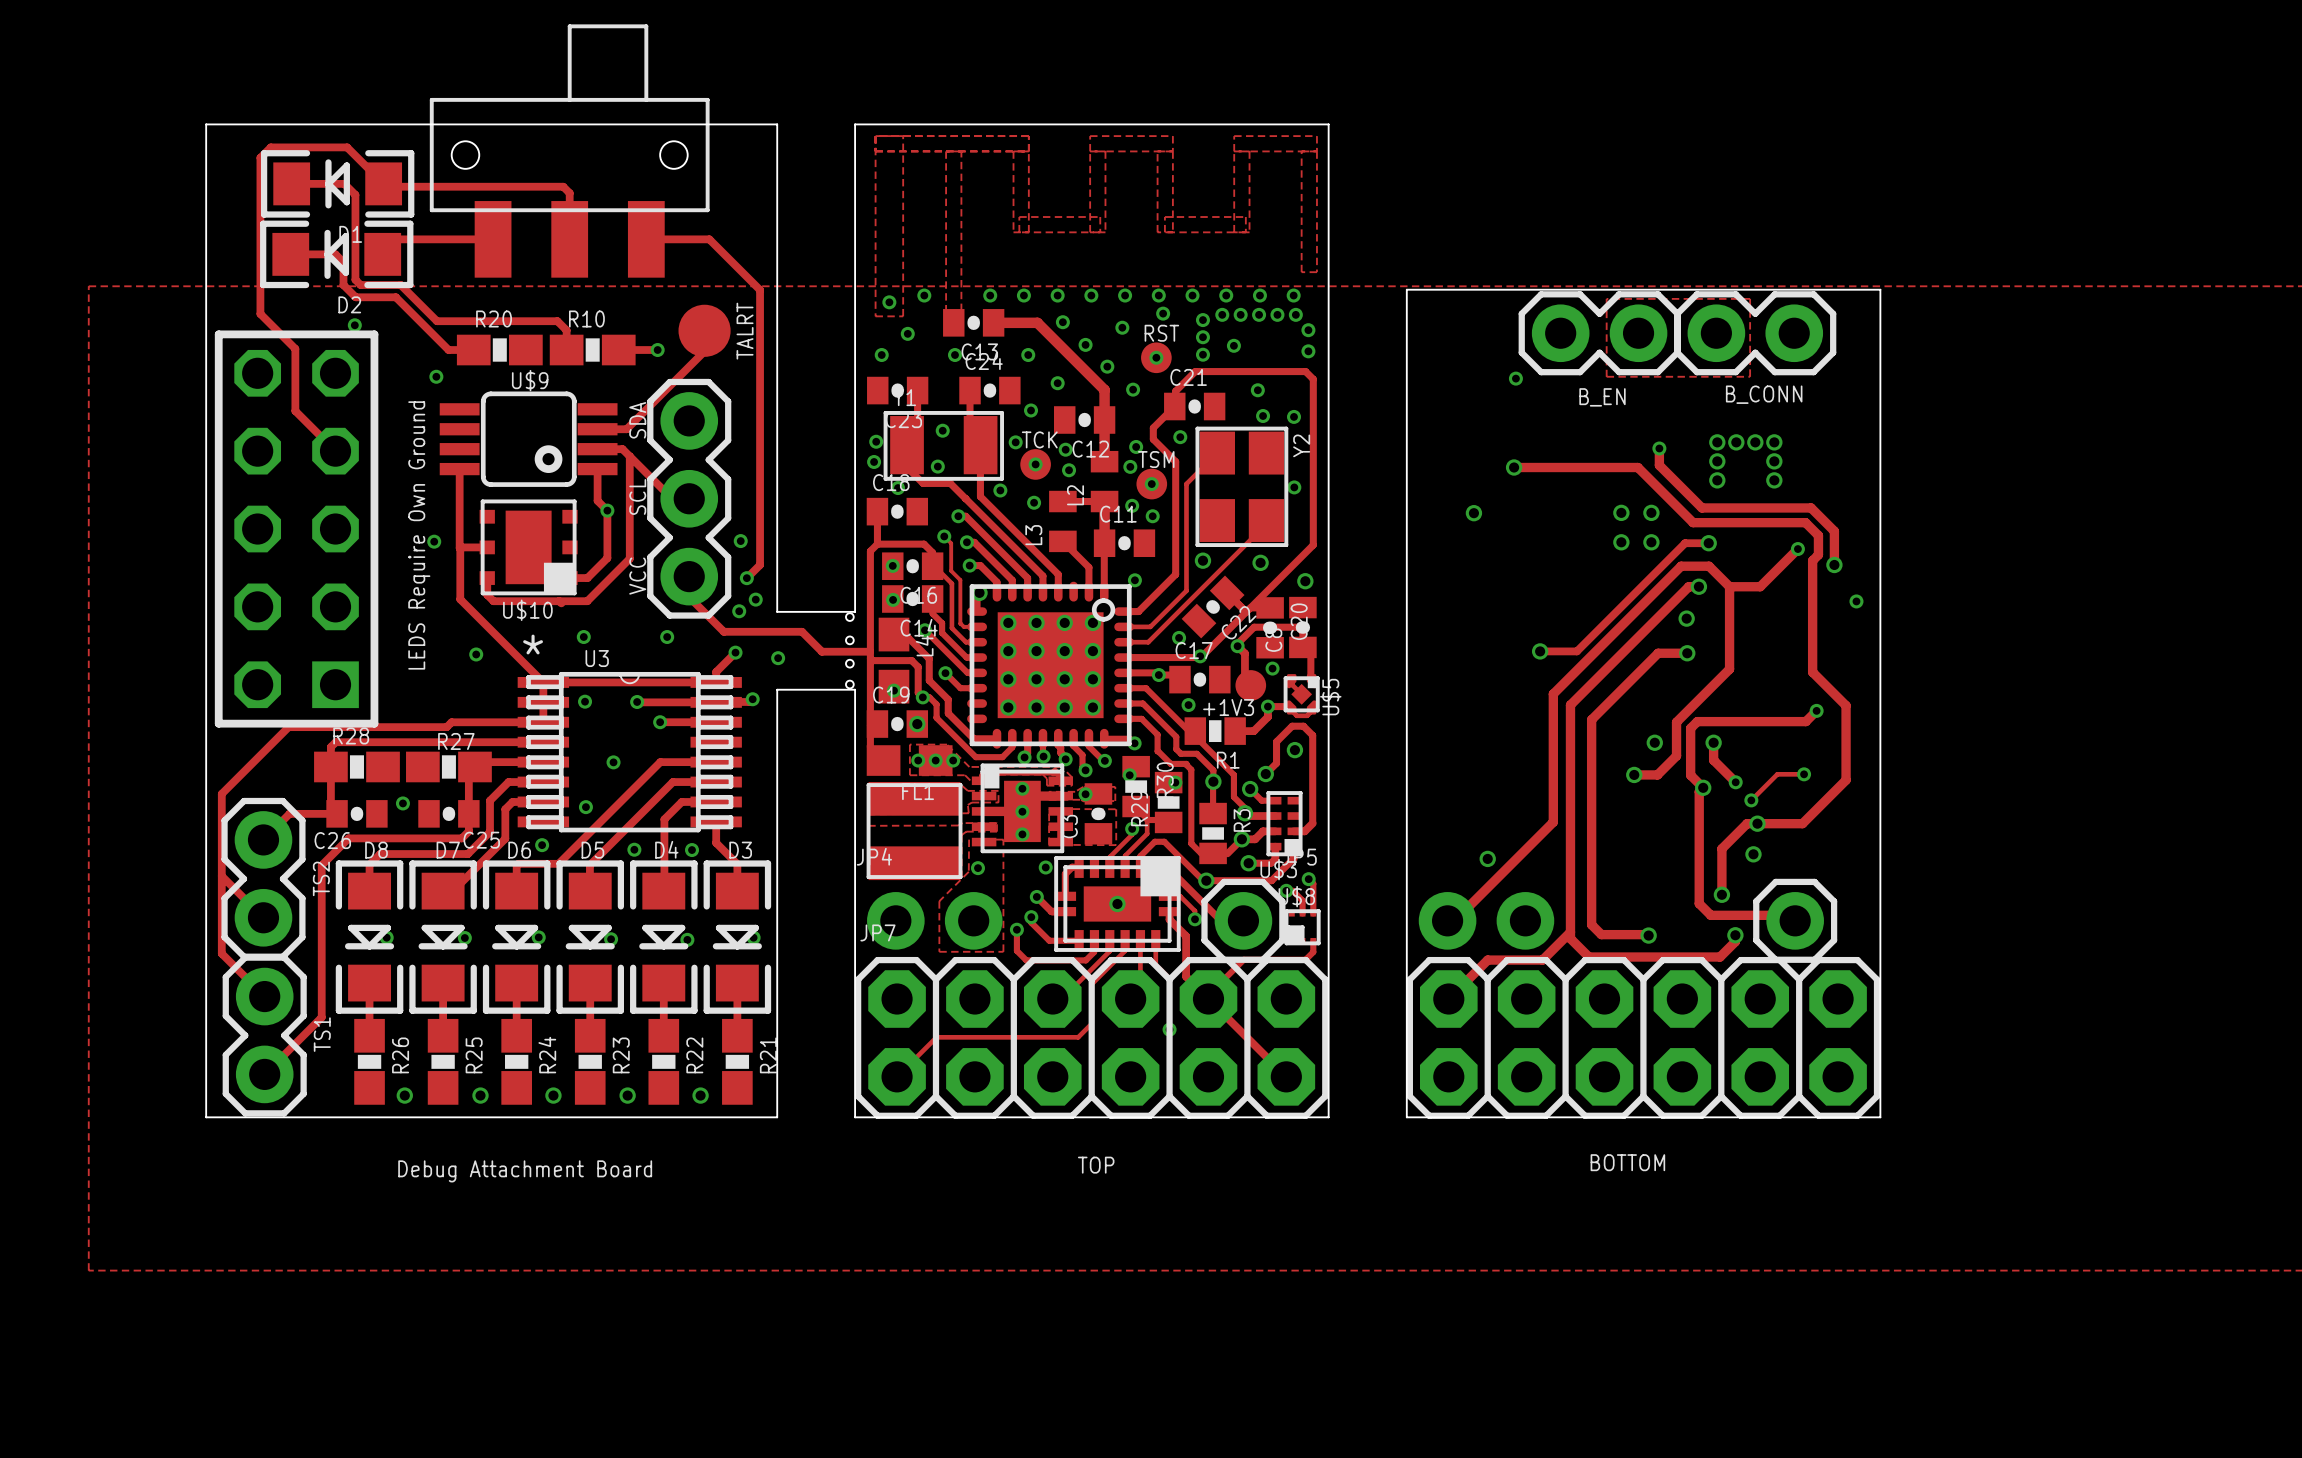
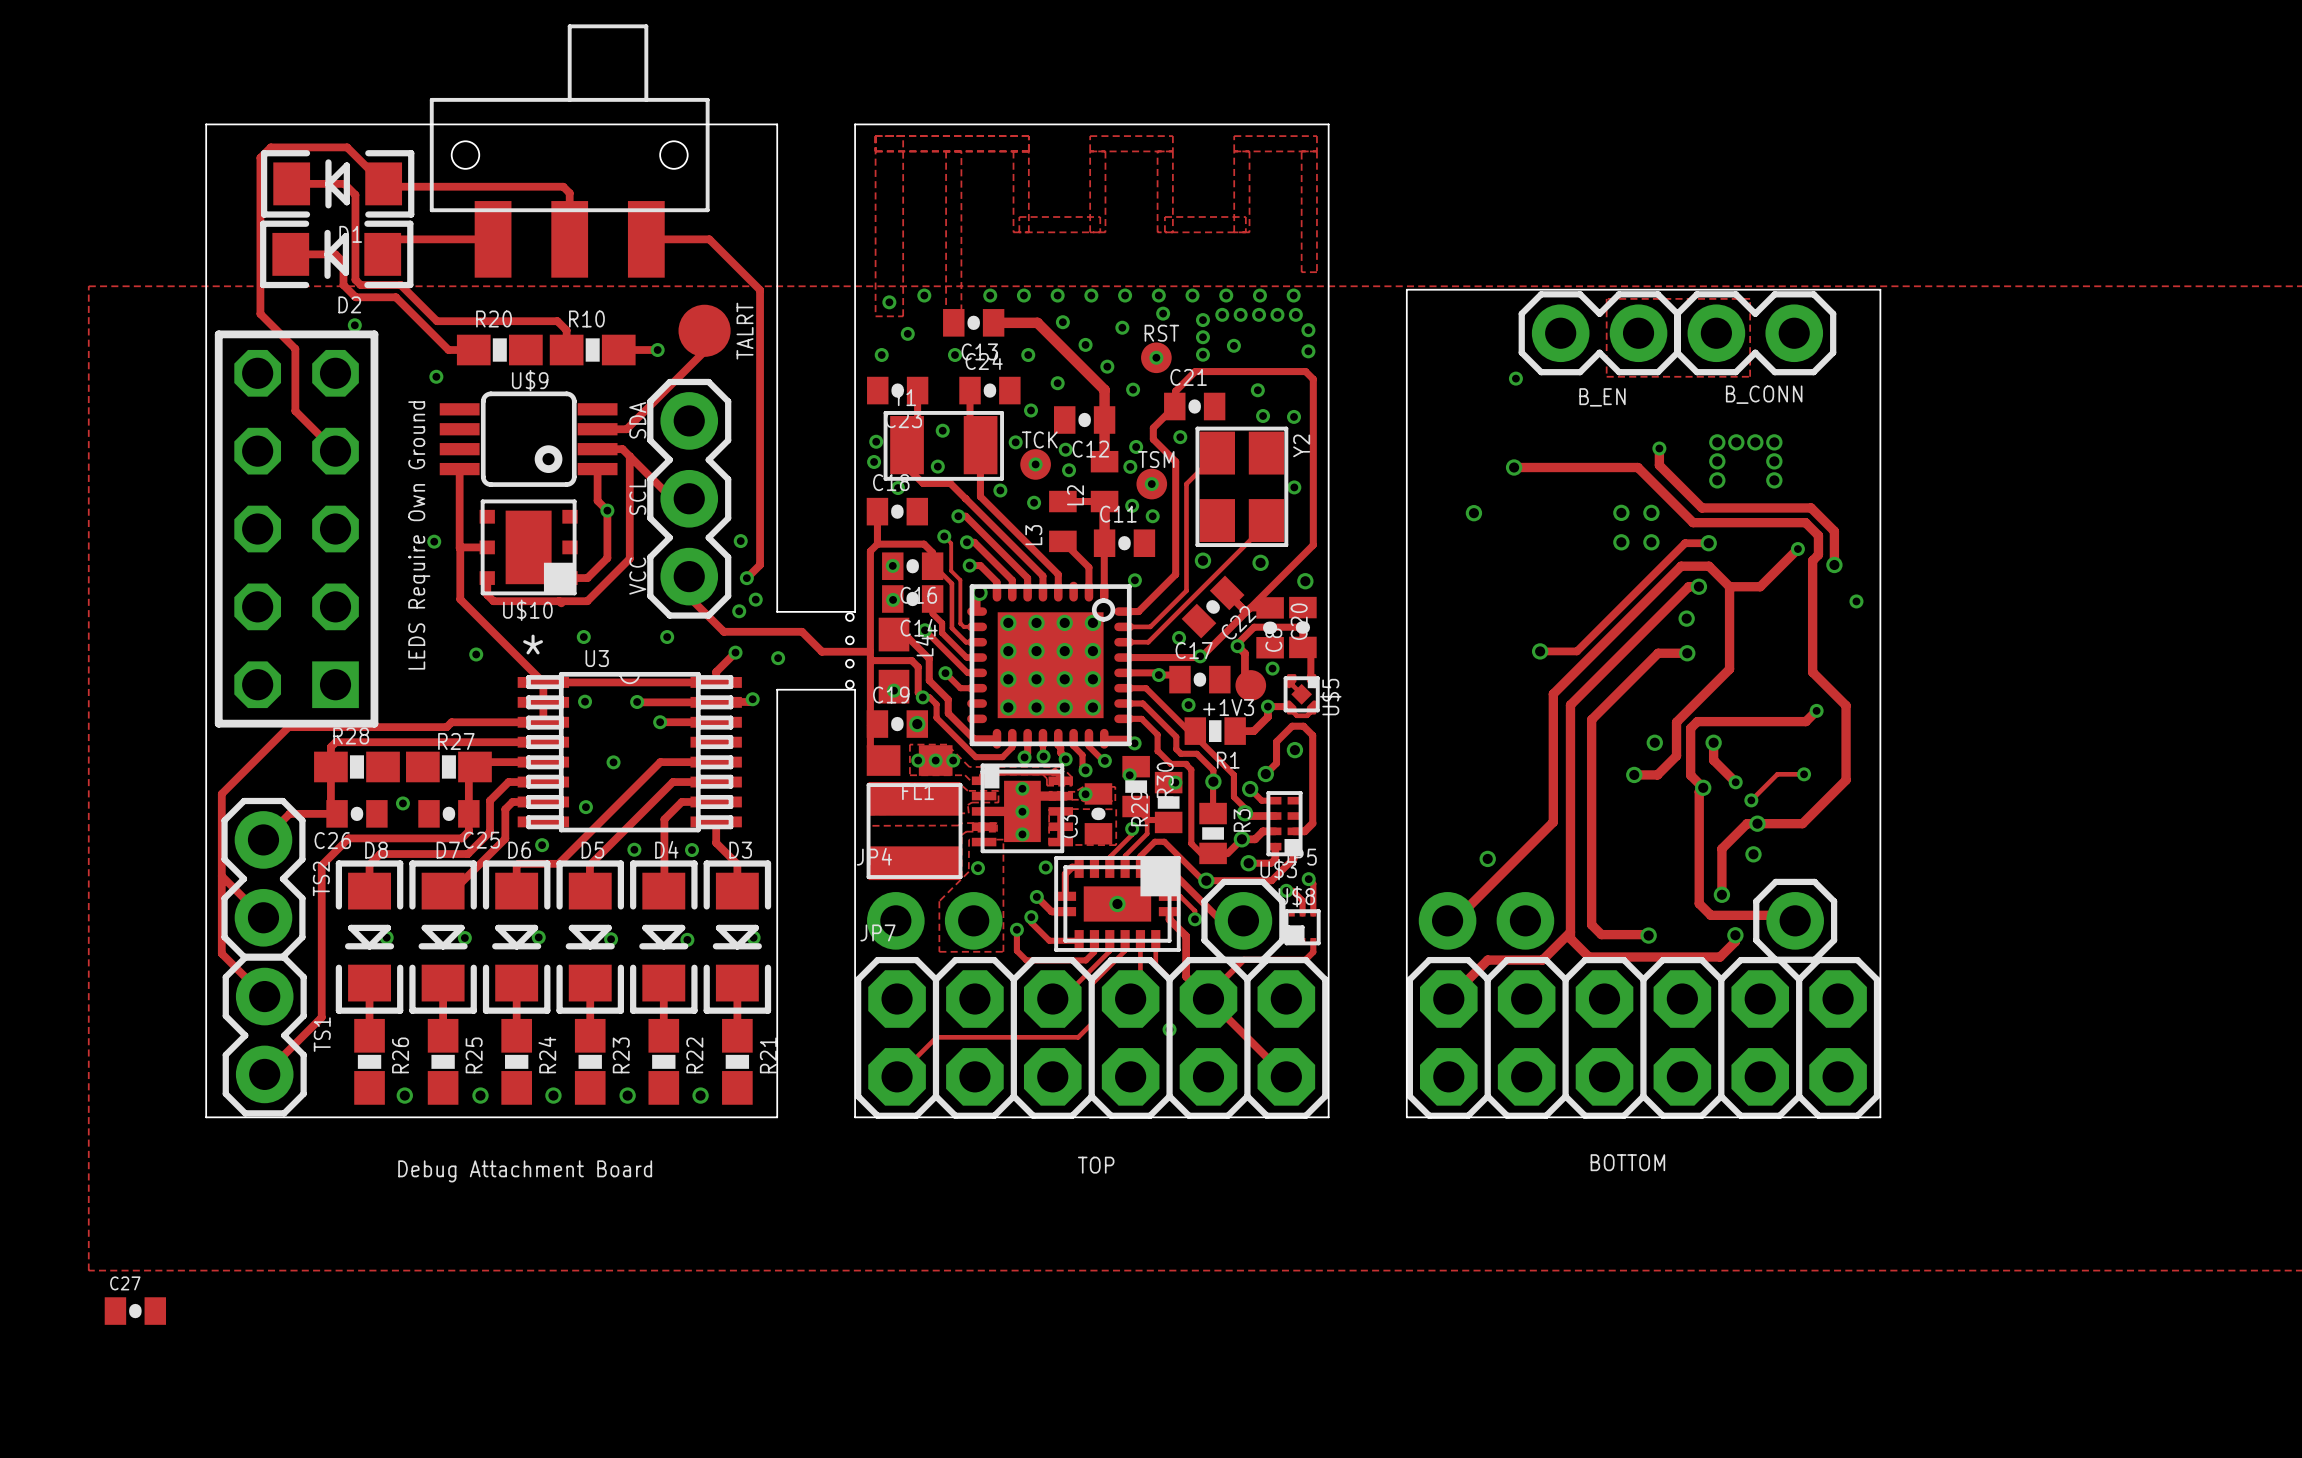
C27: none -> (135, 1311)

